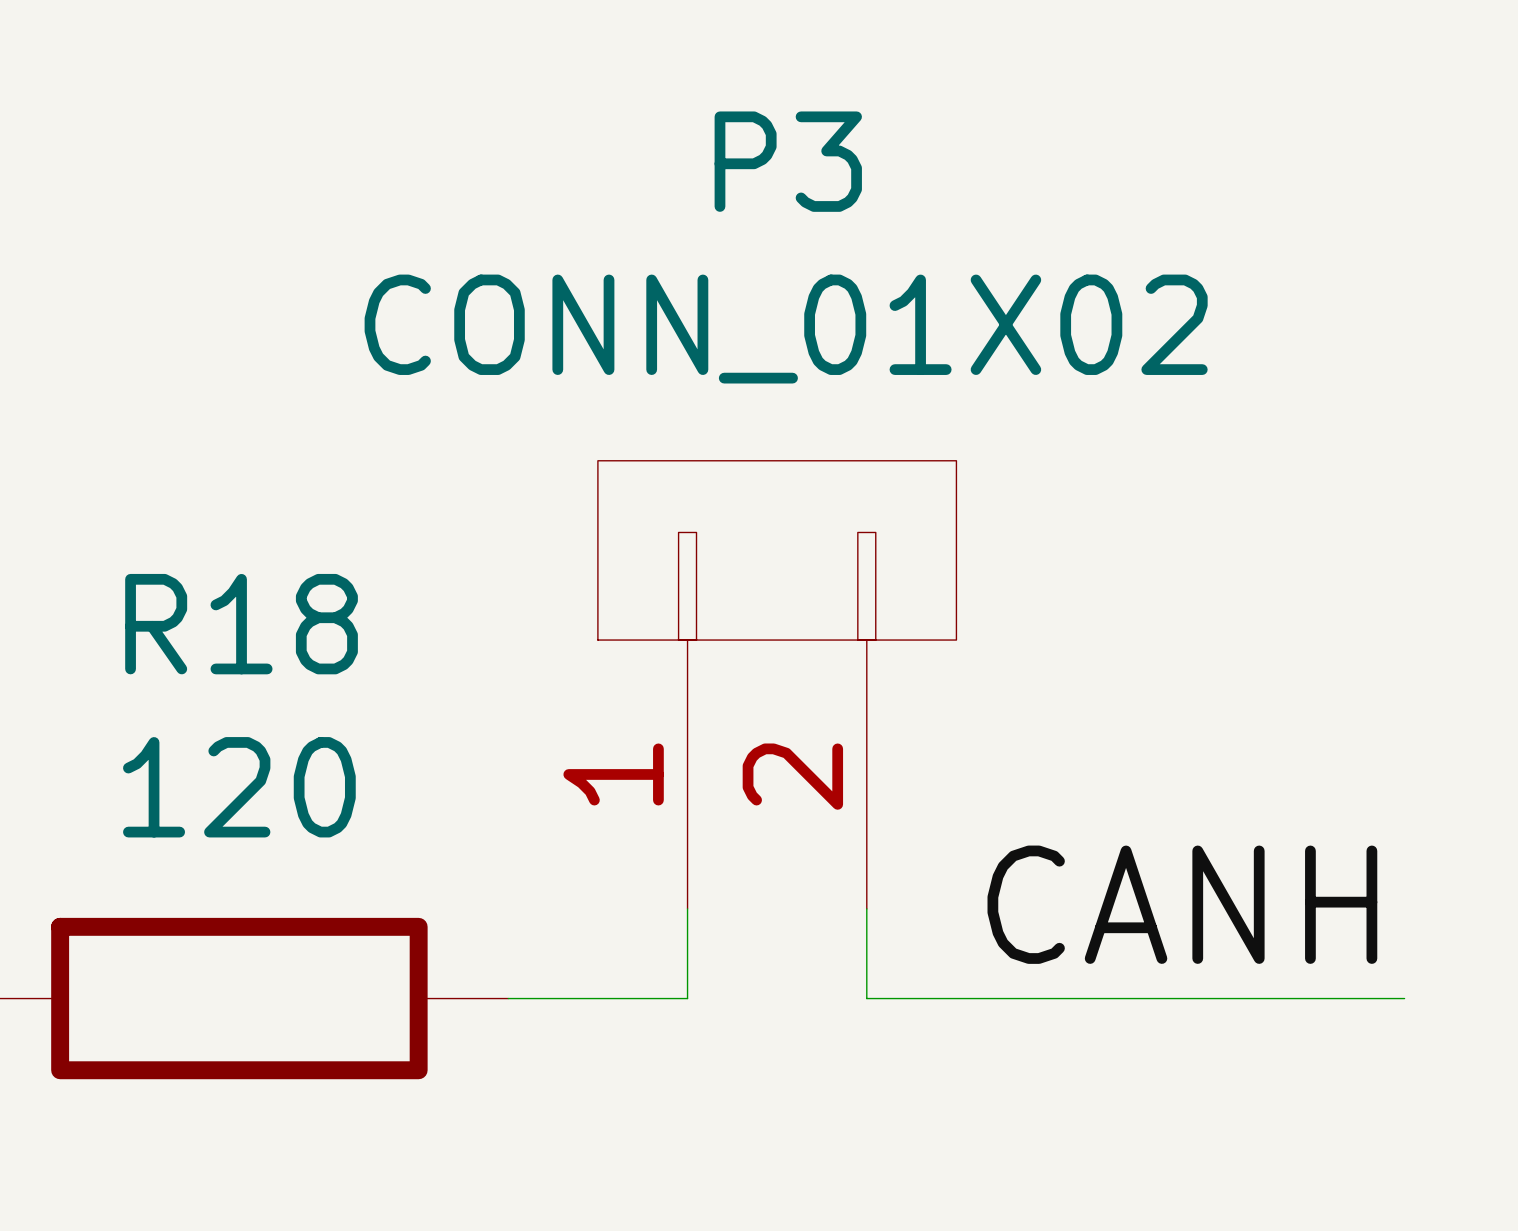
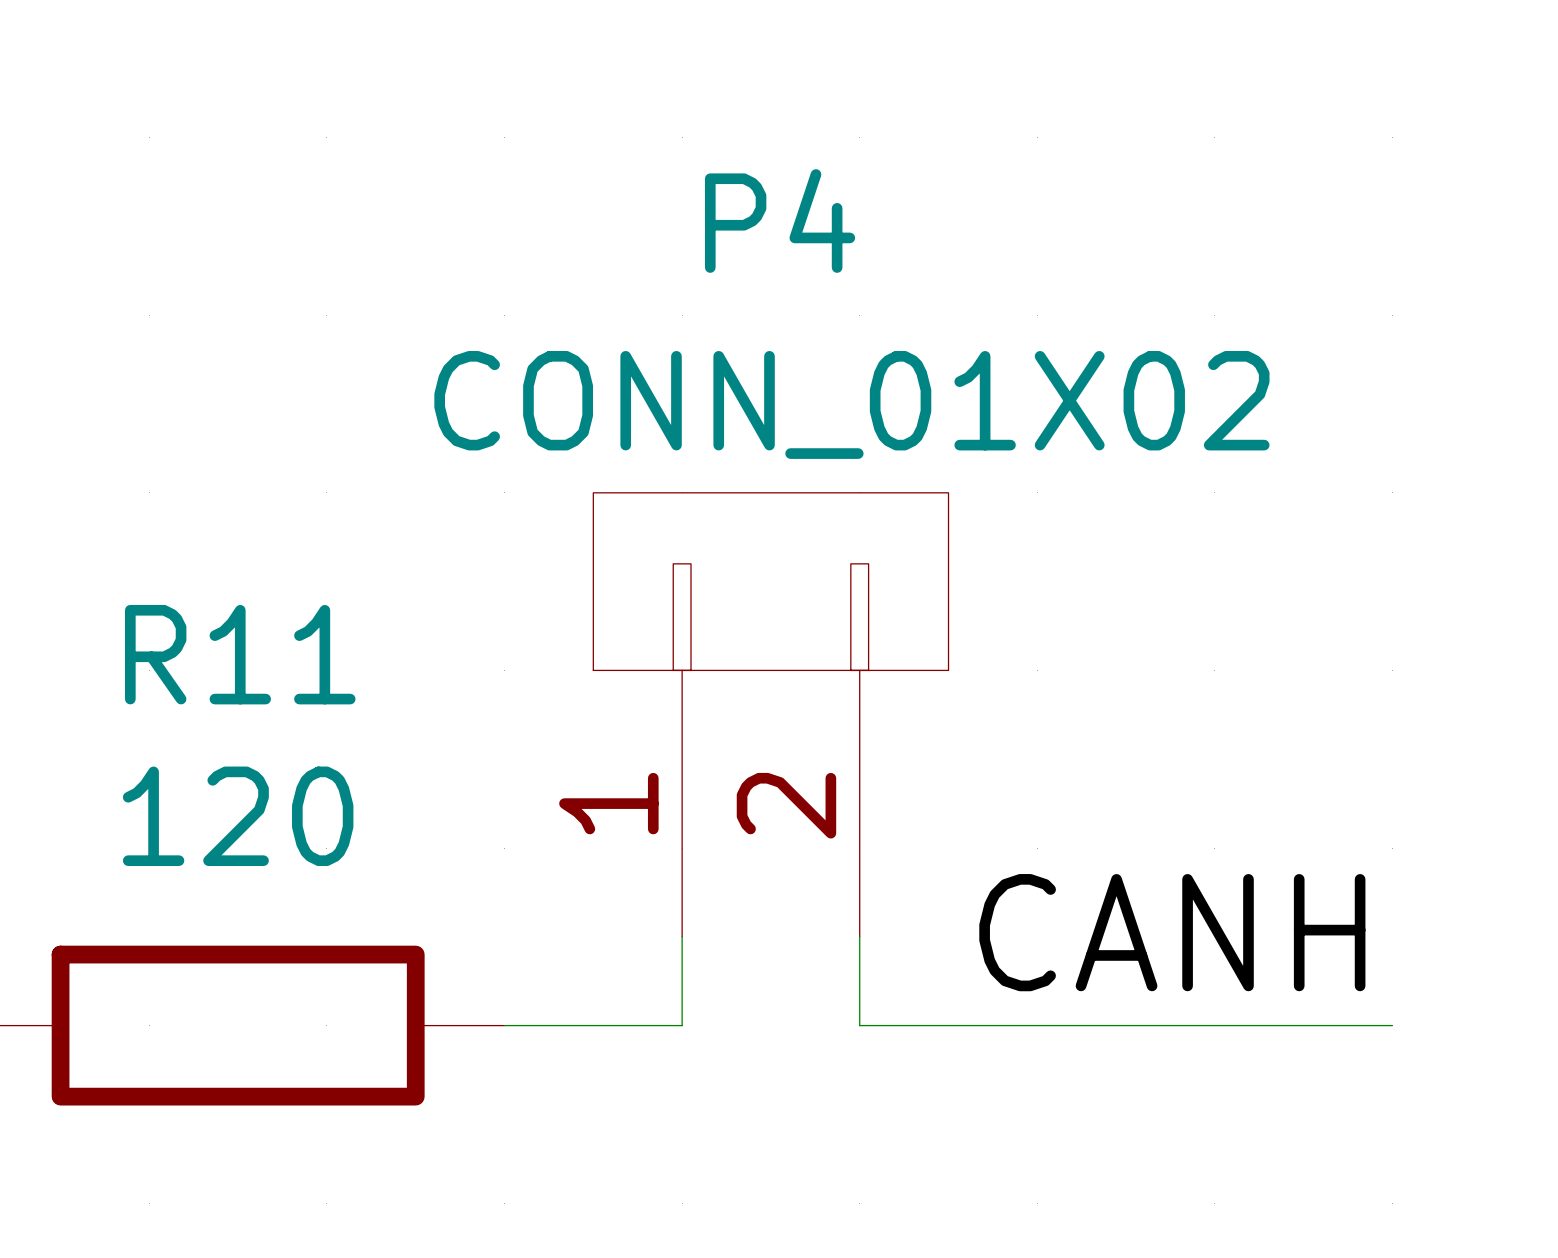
P3 name: P3 (788, 161) -> P4 (780, 221)
P3 value position: CONN_01X02 (786, 329) -> CONN_01X02 (851, 404)
R18 name: R18 (241, 624) -> R11 (240, 654)

